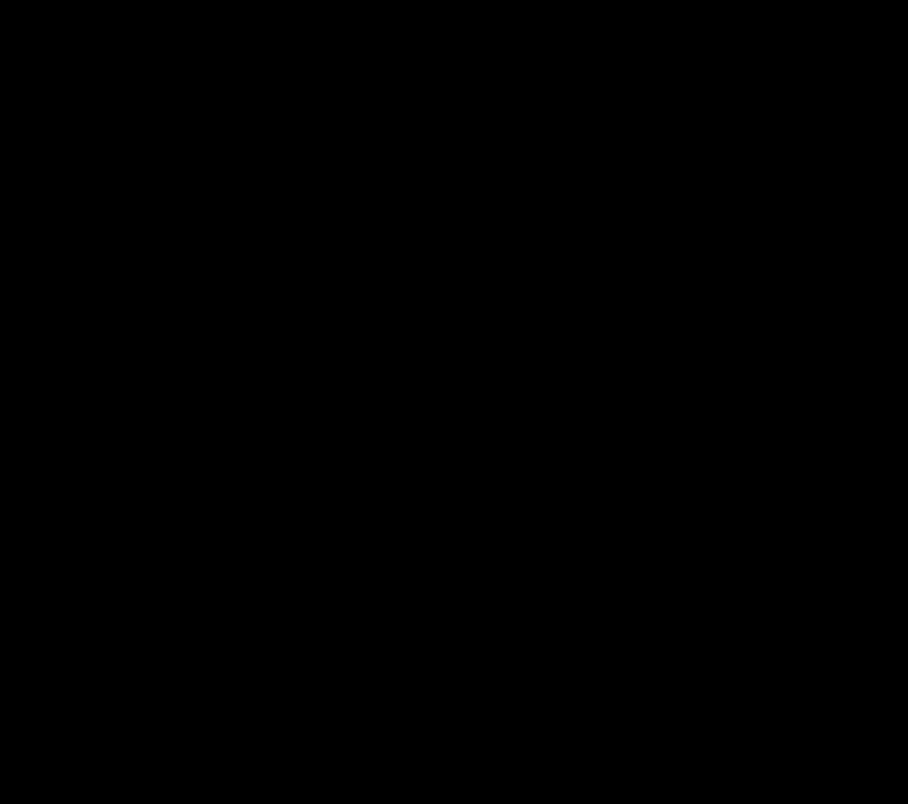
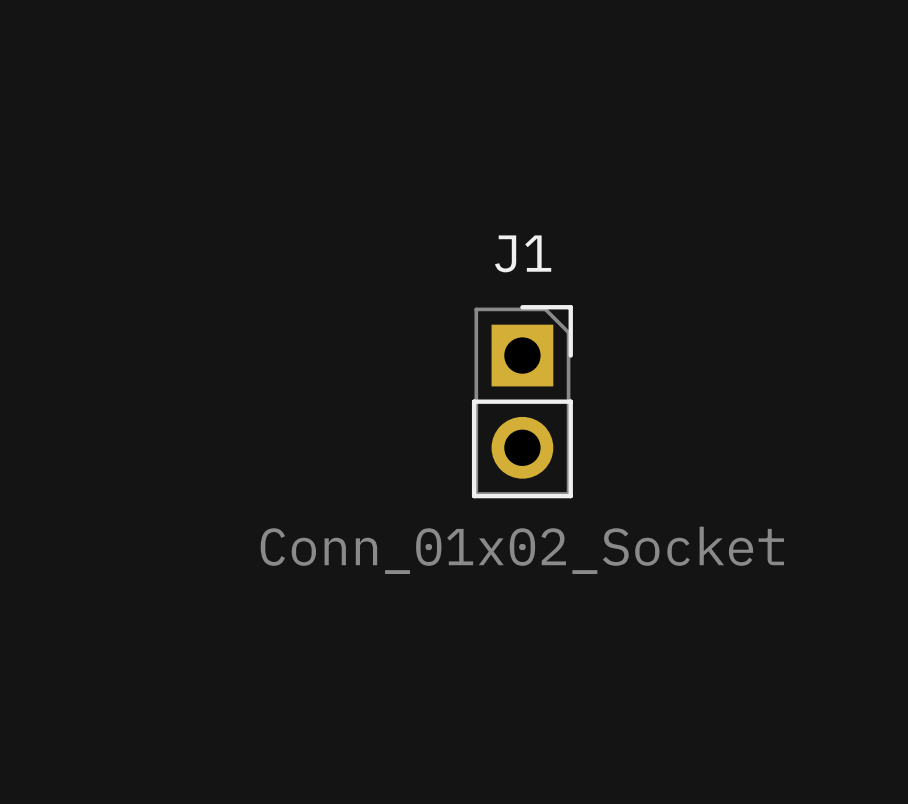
J1: none -> Conn_01x02_Socket (522, 401)

